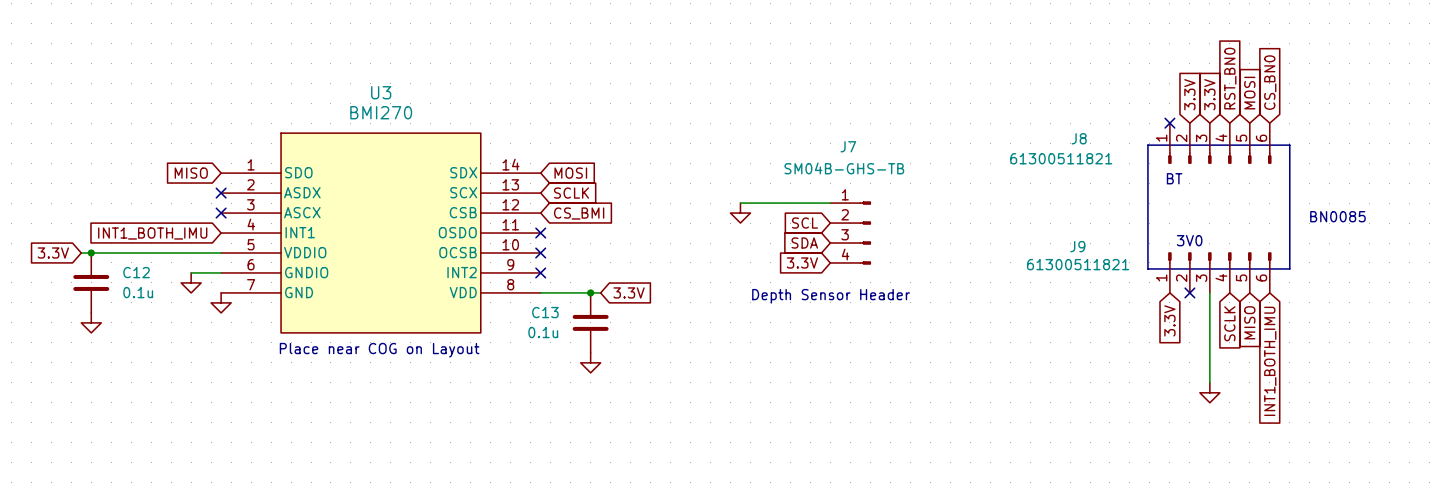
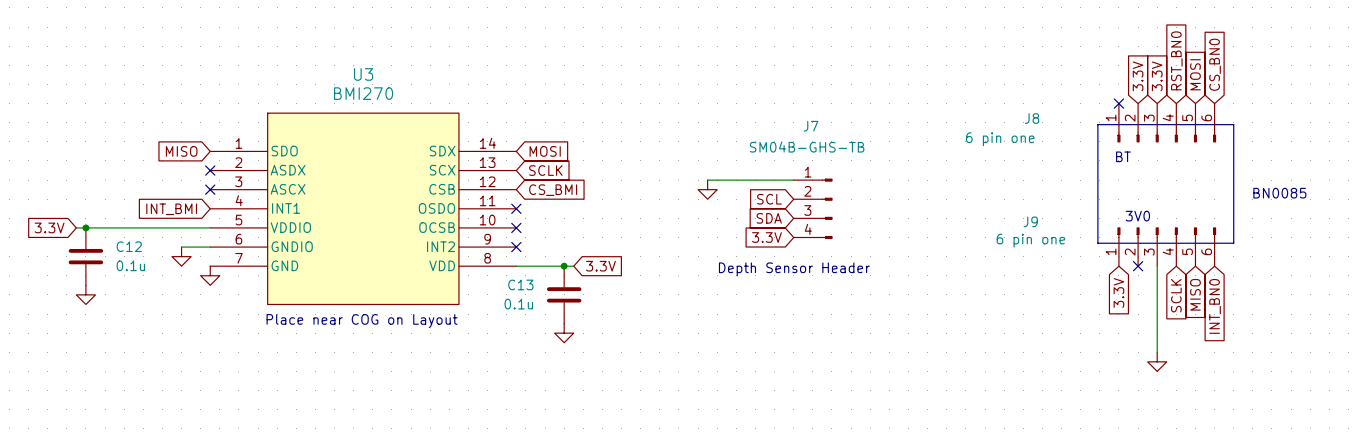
J8 value: 61300511821 (1061, 158) -> 6 pin one (1000, 139)
global label: INT1_BOTH_IMU (152, 233) -> INT_BMI (171, 209)
J9 value: 61300511821 (1078, 264) -> 6 pin one (1030, 240)
global label: INT1_BOTH_IMU (1270, 361) -> INT_BN0 (1215, 306)

